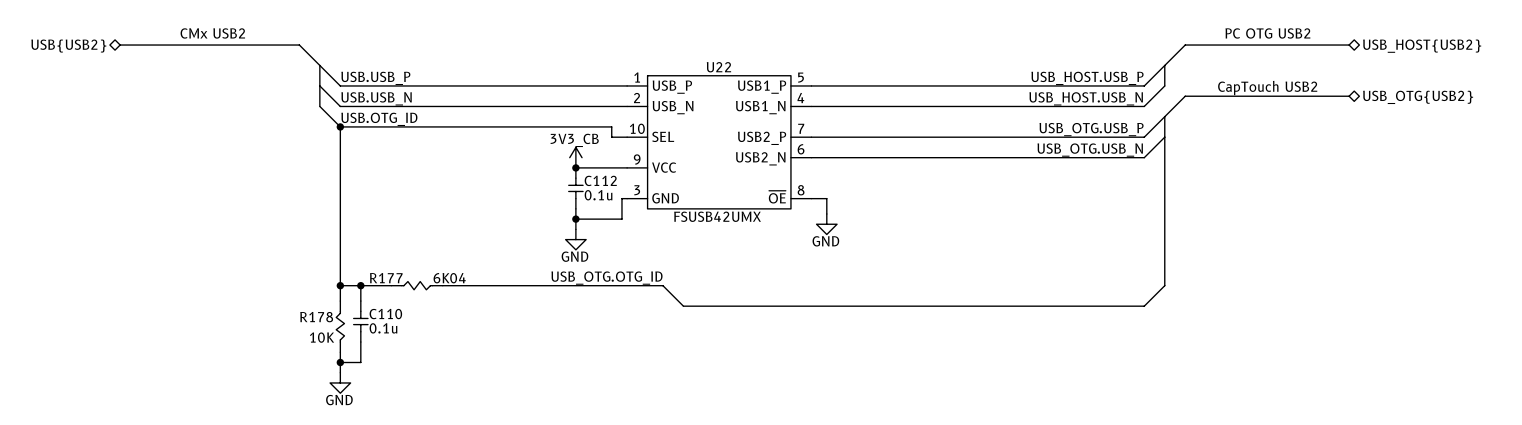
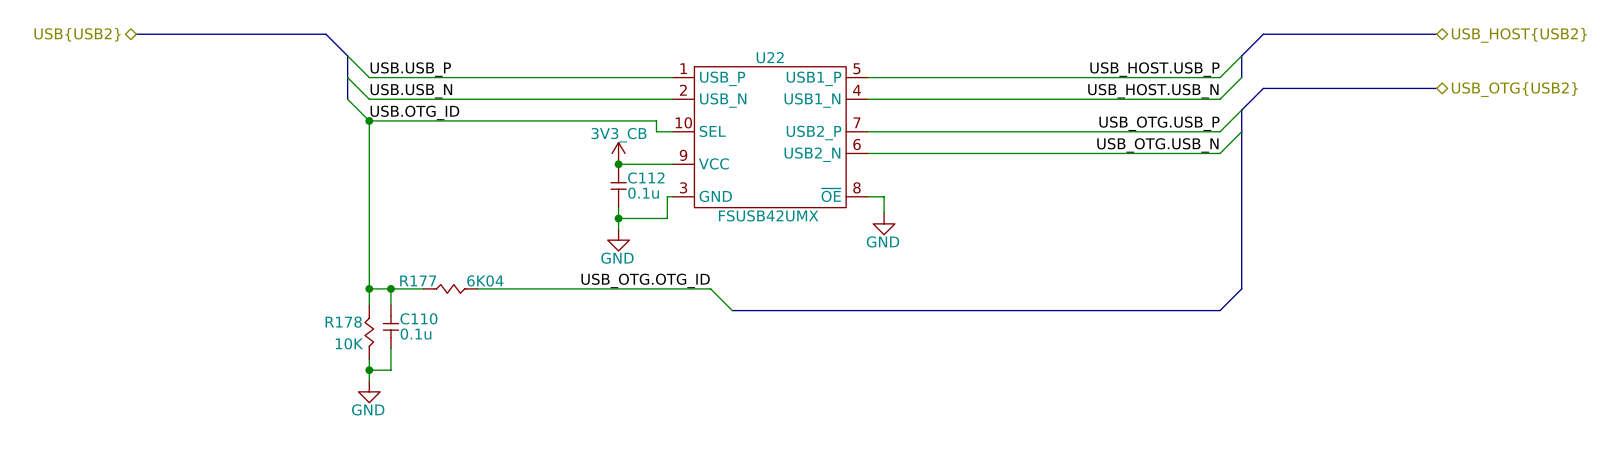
text: CMx USB2 (212, 33) -> none
text: PC OTG USB2 (1267, 33) -> none
text: CapTouch USB2 (1267, 88) -> none

